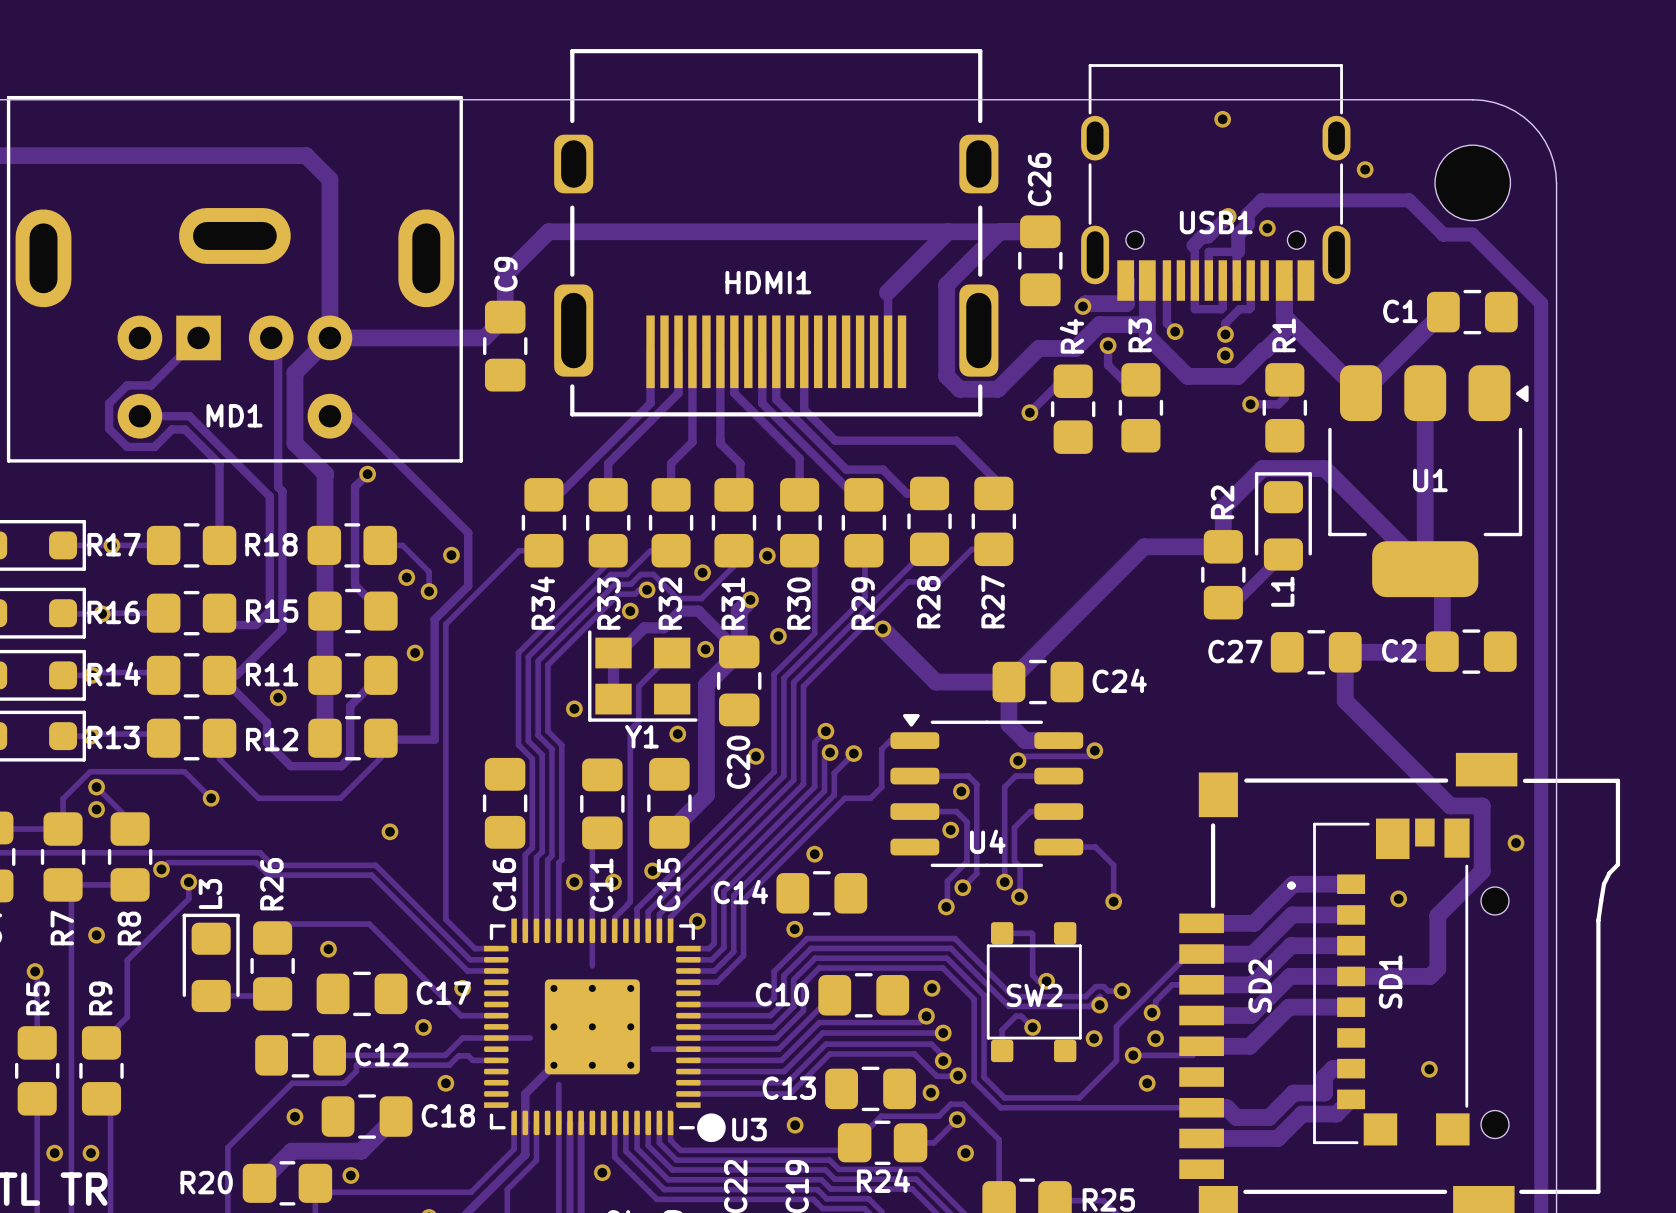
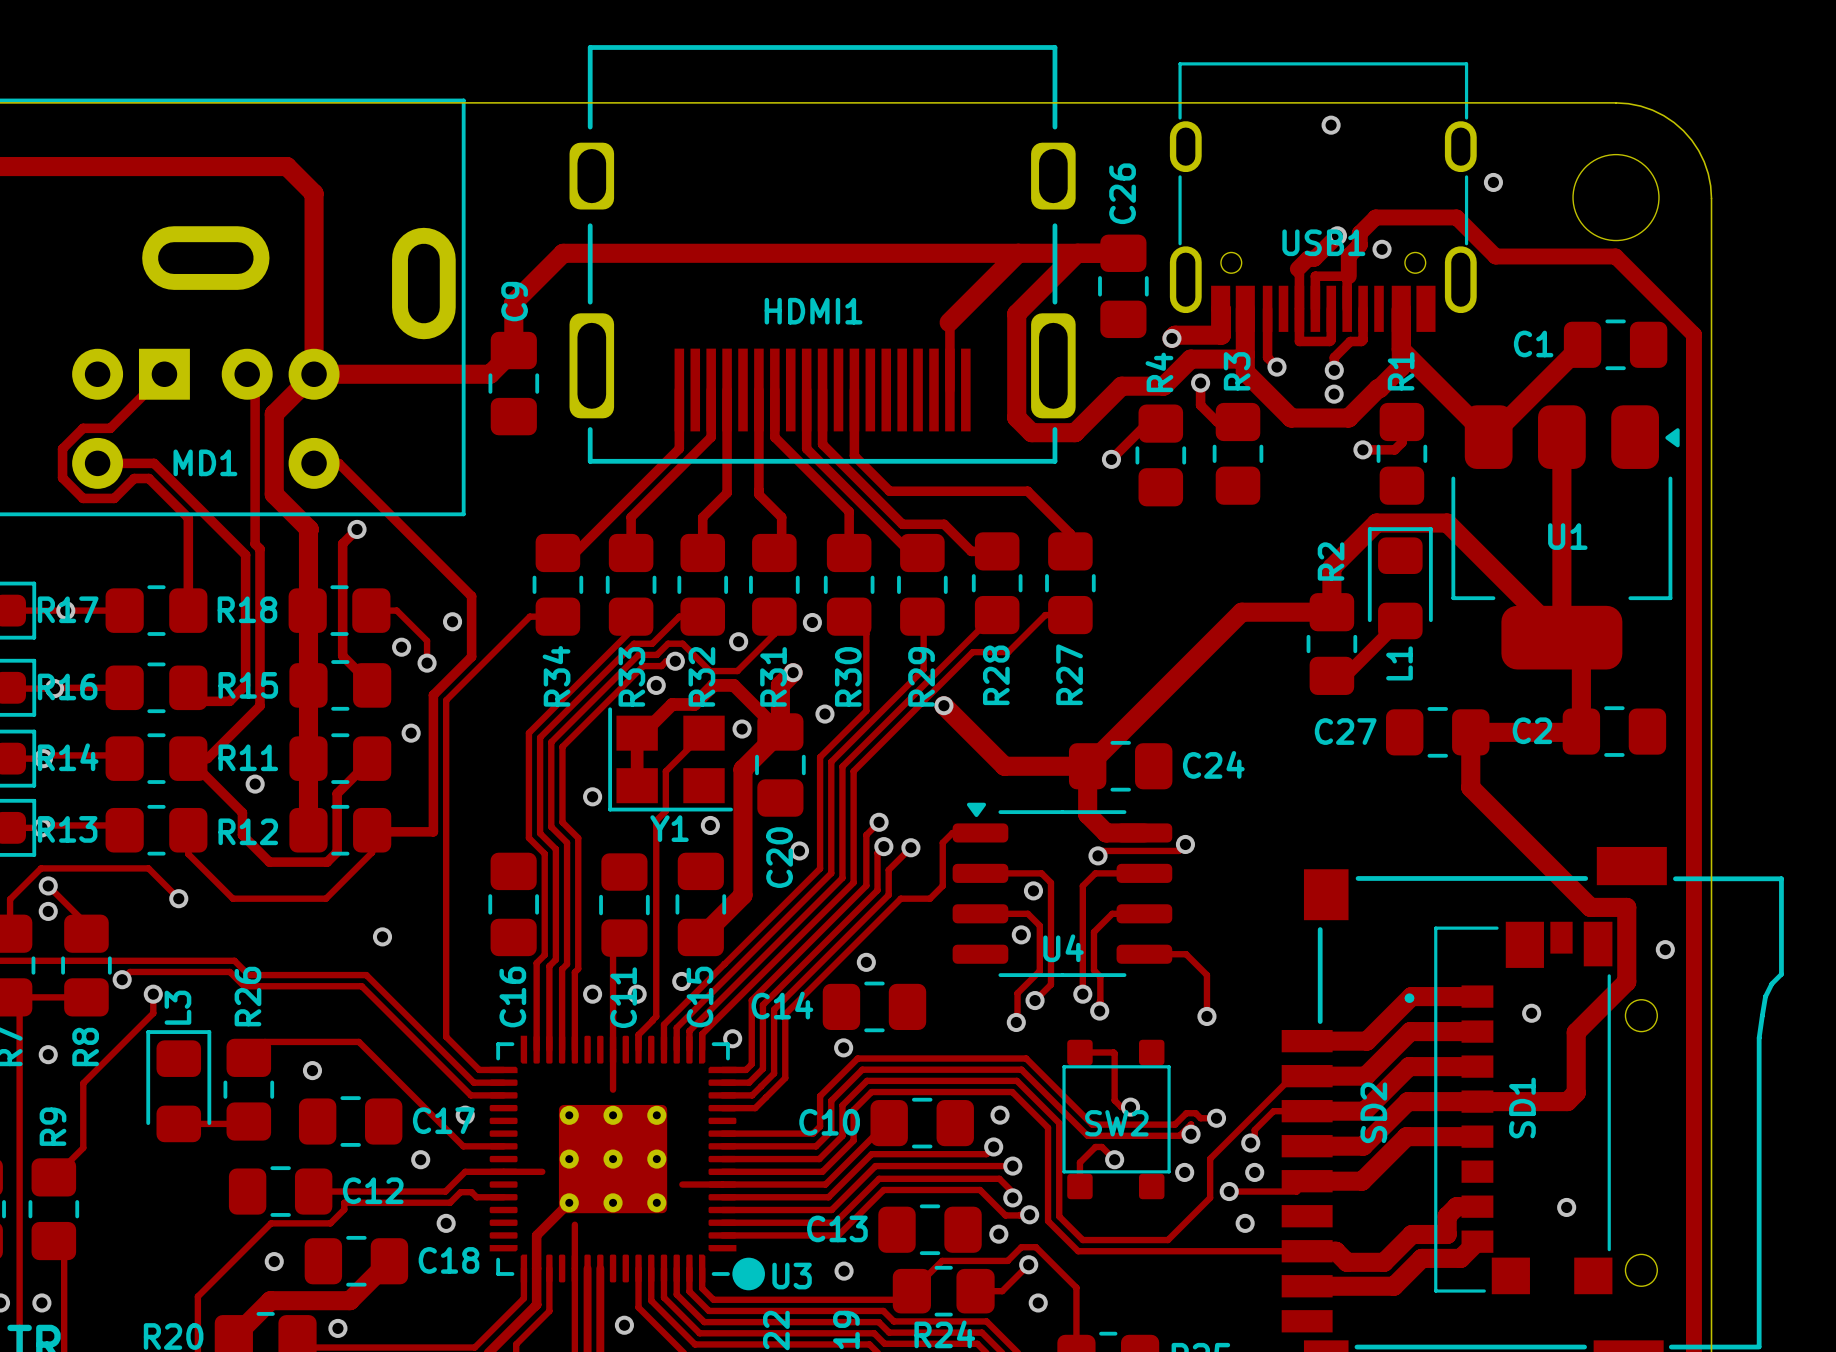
track: (1332, 200) (1409, 200) (1443, 234) -> (1456, 217) (1495, 256) (1582, 256)

